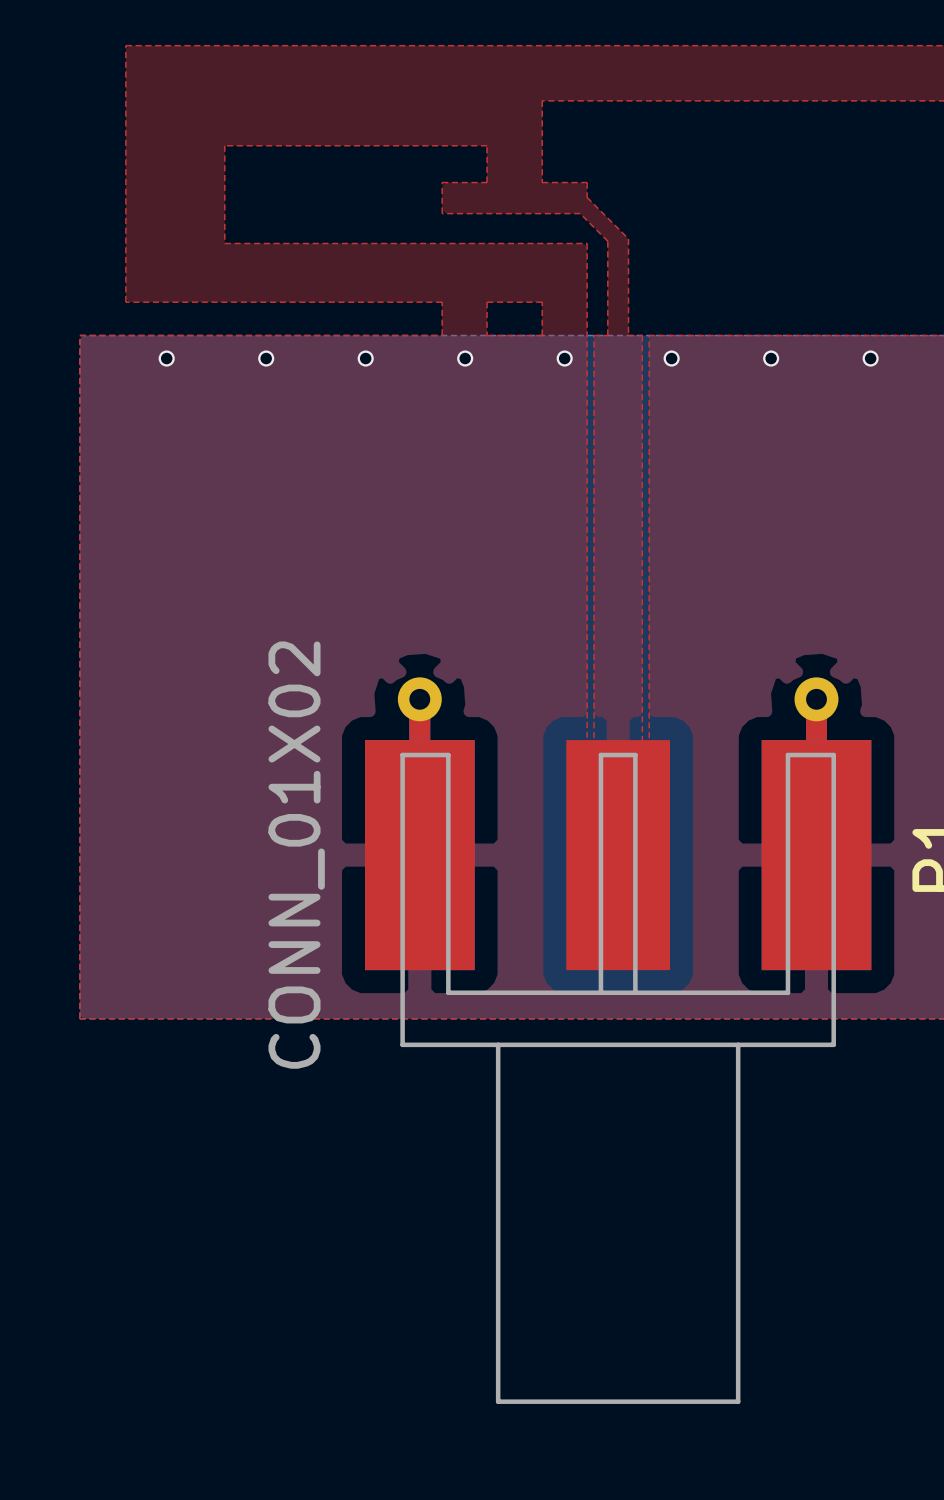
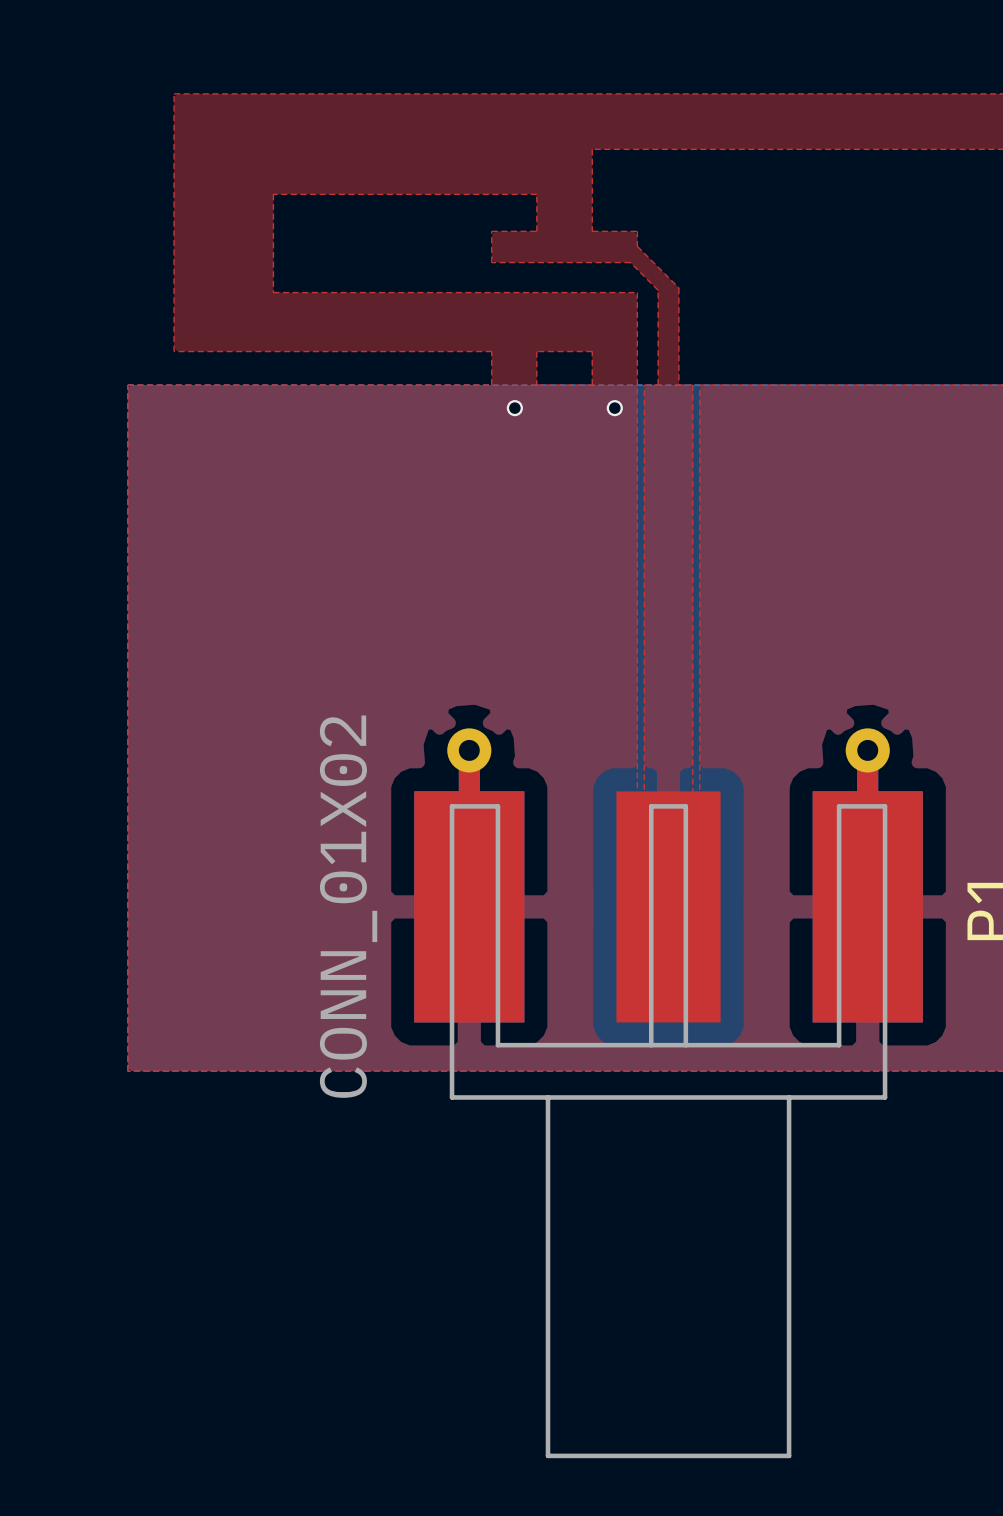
via: (166, 358) -> none
via: (266, 358) -> none
via: (365, 358) -> none
via: (671, 358) -> none
via: (771, 358) -> none
via: (870, 358) -> none

